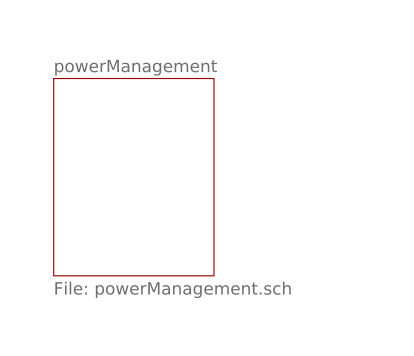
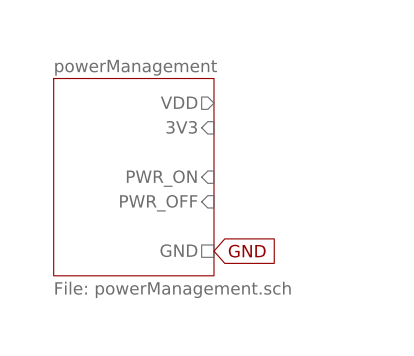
sheet pin: none -> VDD (179, 102)
sheet pin: none -> 3V3 (181, 127)
sheet pin: none -> PWR_ON (161, 178)
sheet pin: none -> PWR_OFF (158, 203)
sheet pin: none -> GND (178, 250)
global label: none -> GND (247, 251)

